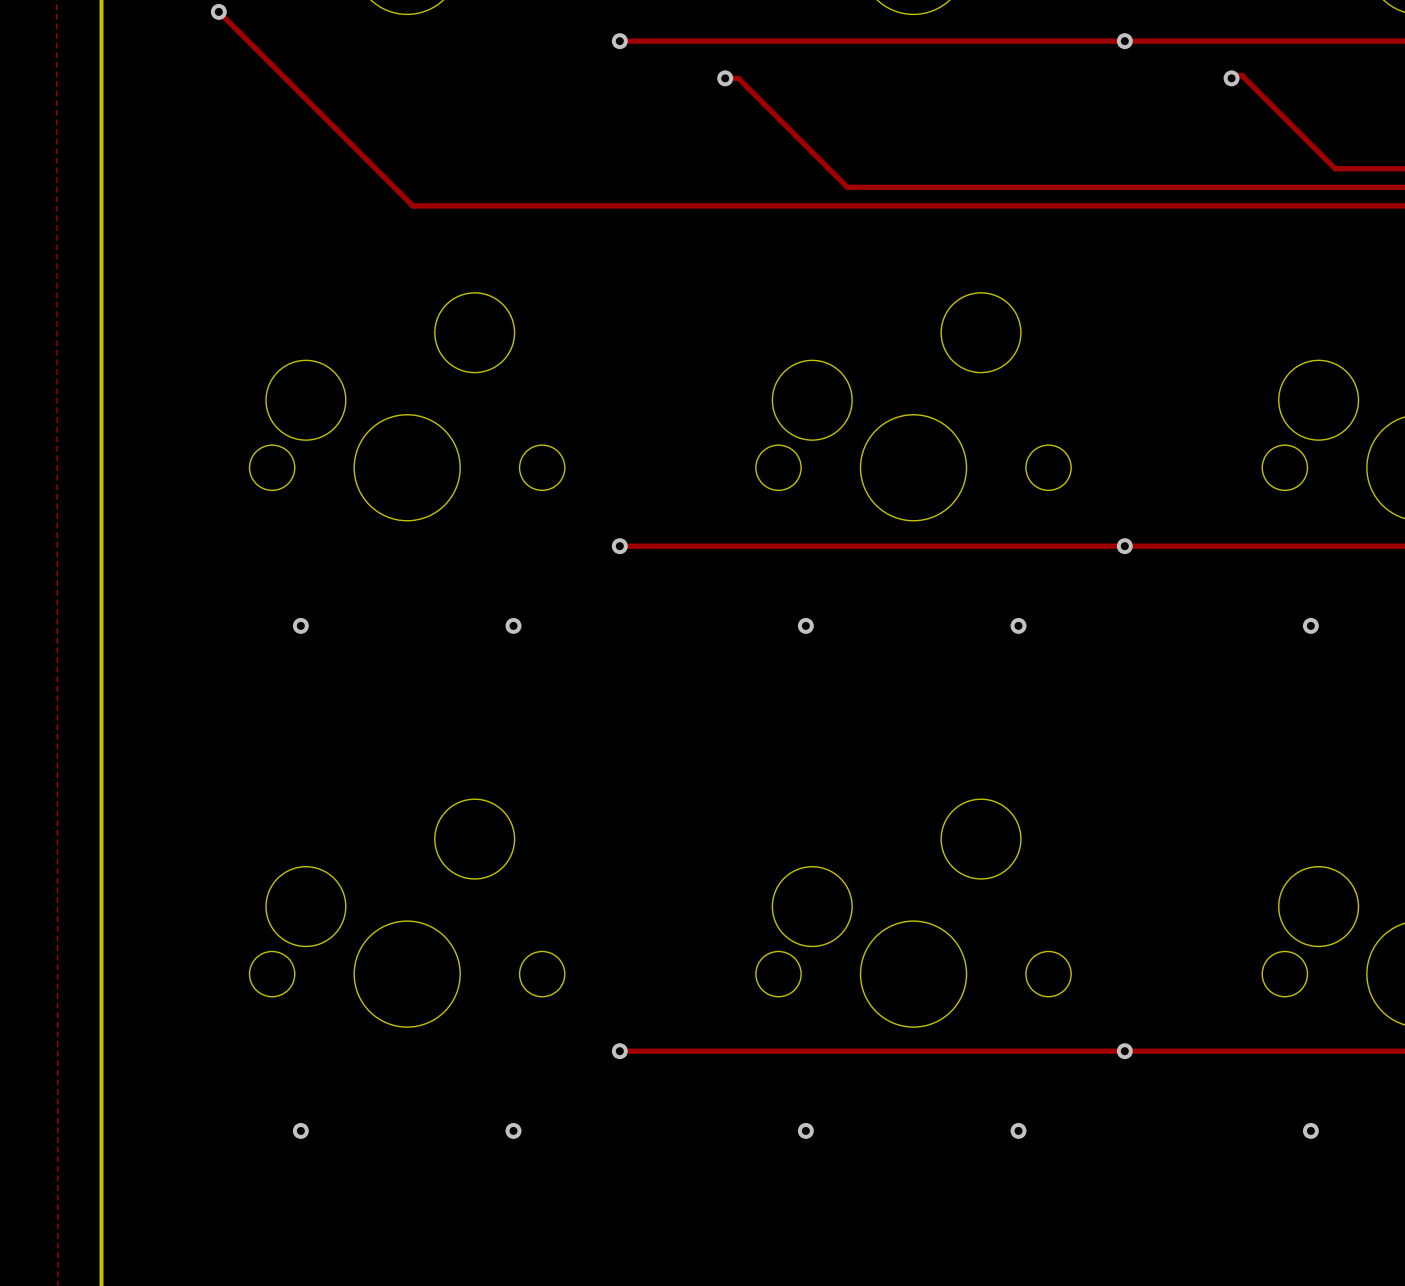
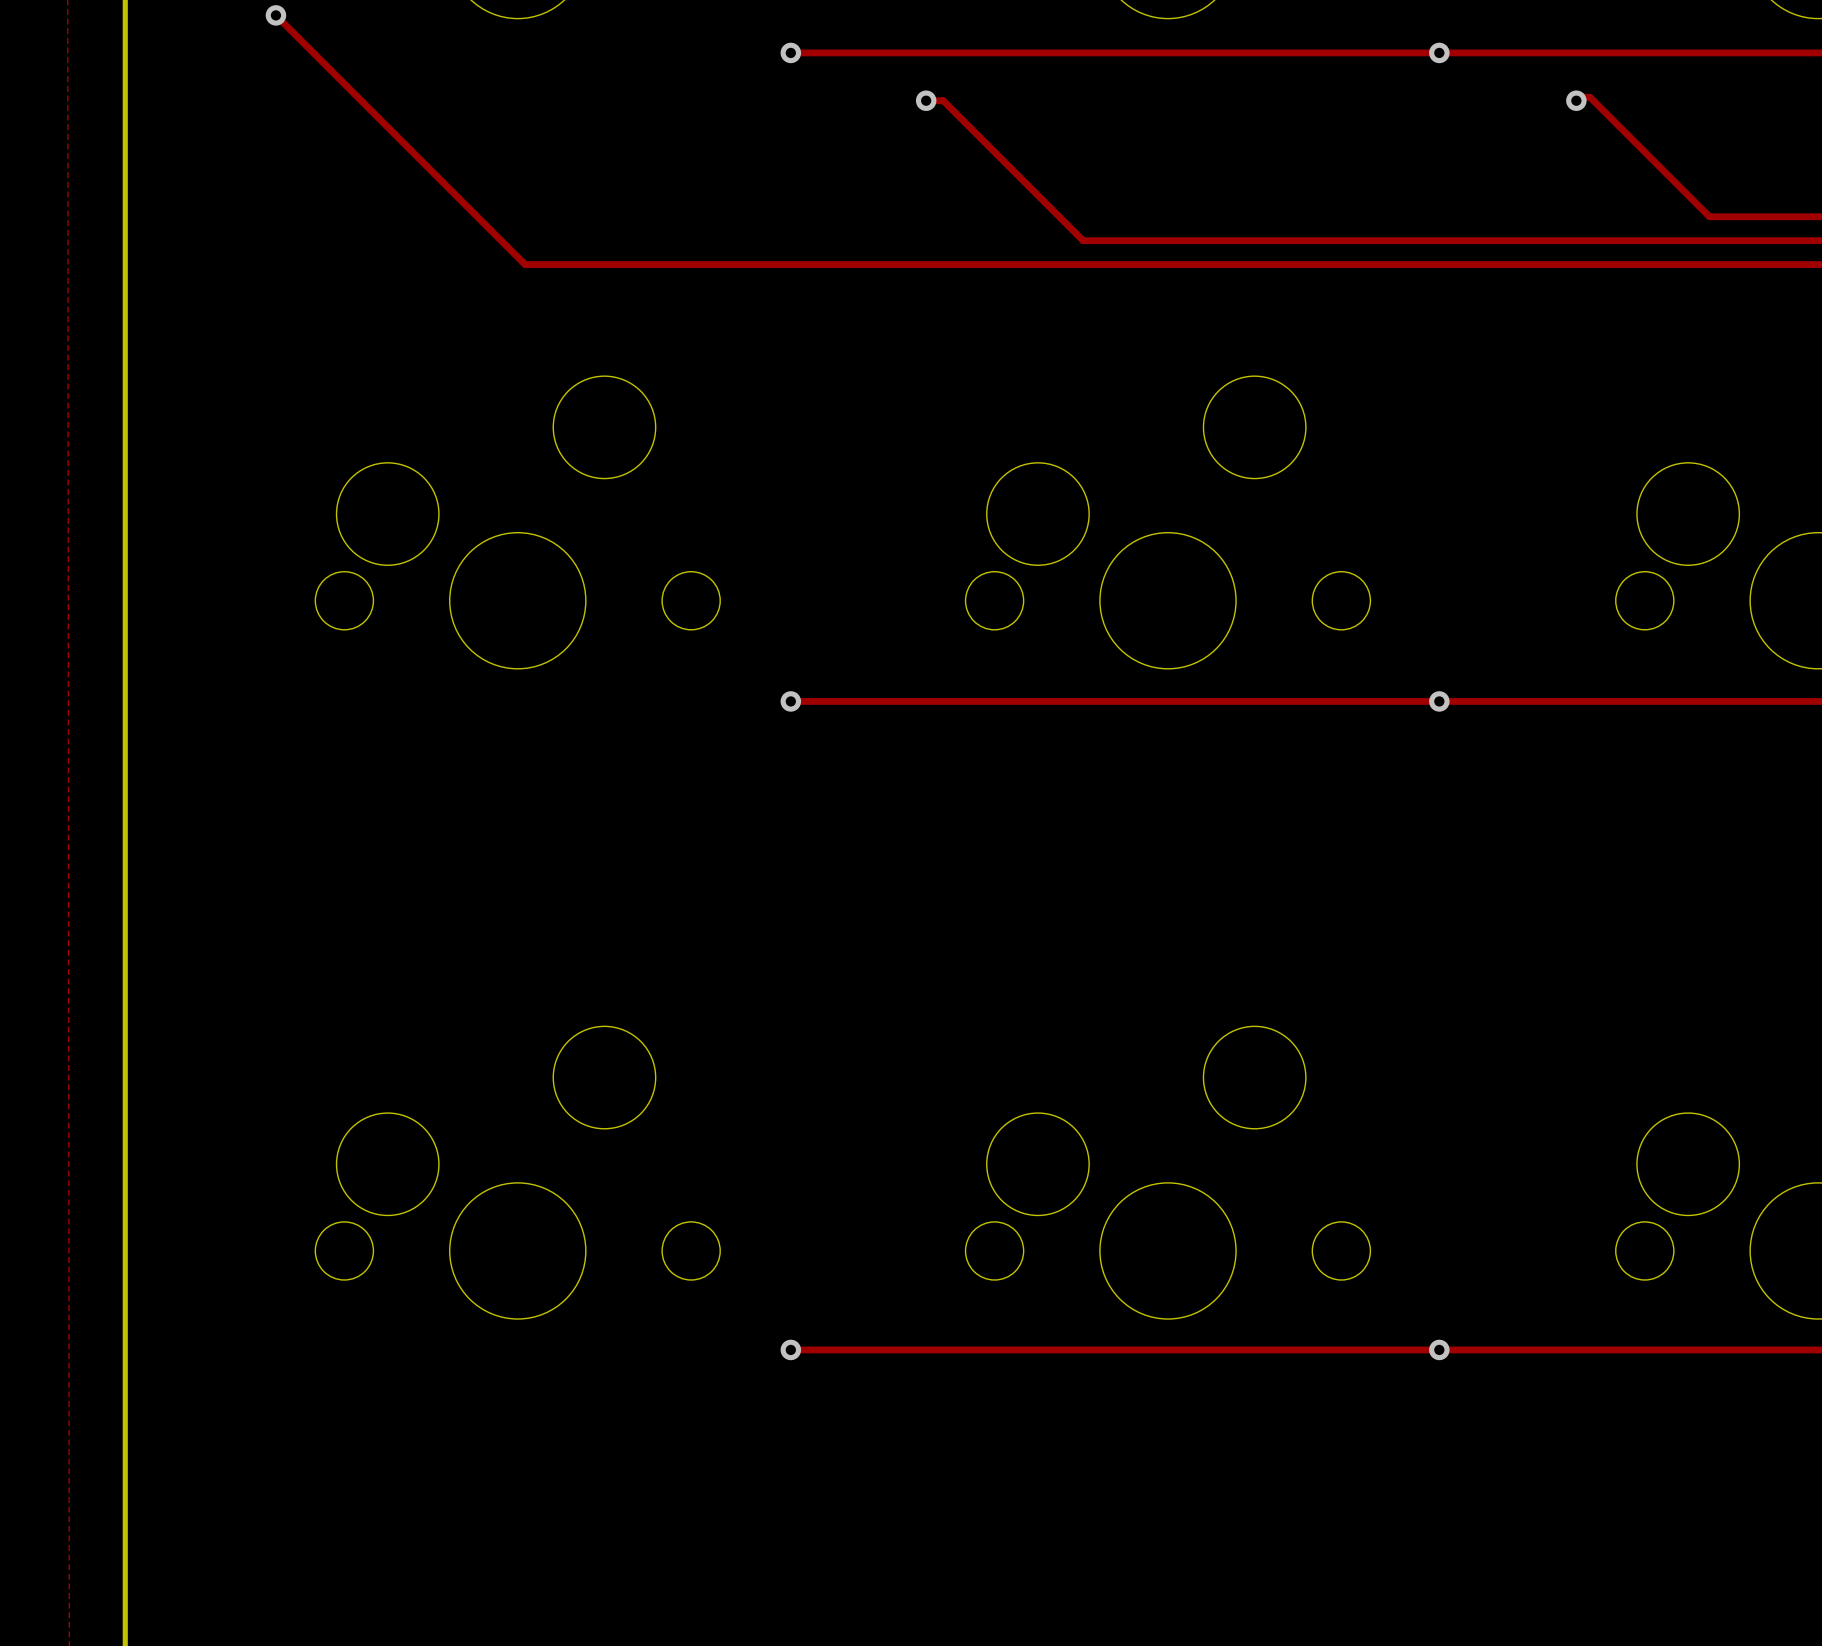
via: (300, 625) -> none
via: (513, 625) -> none
via: (805, 625) -> none
via: (1018, 625) -> none
via: (1310, 625) -> none
via: (300, 1130) -> none
via: (513, 1130) -> none
via: (805, 1130) -> none
via: (1018, 1130) -> none
via: (1310, 1130) -> none

